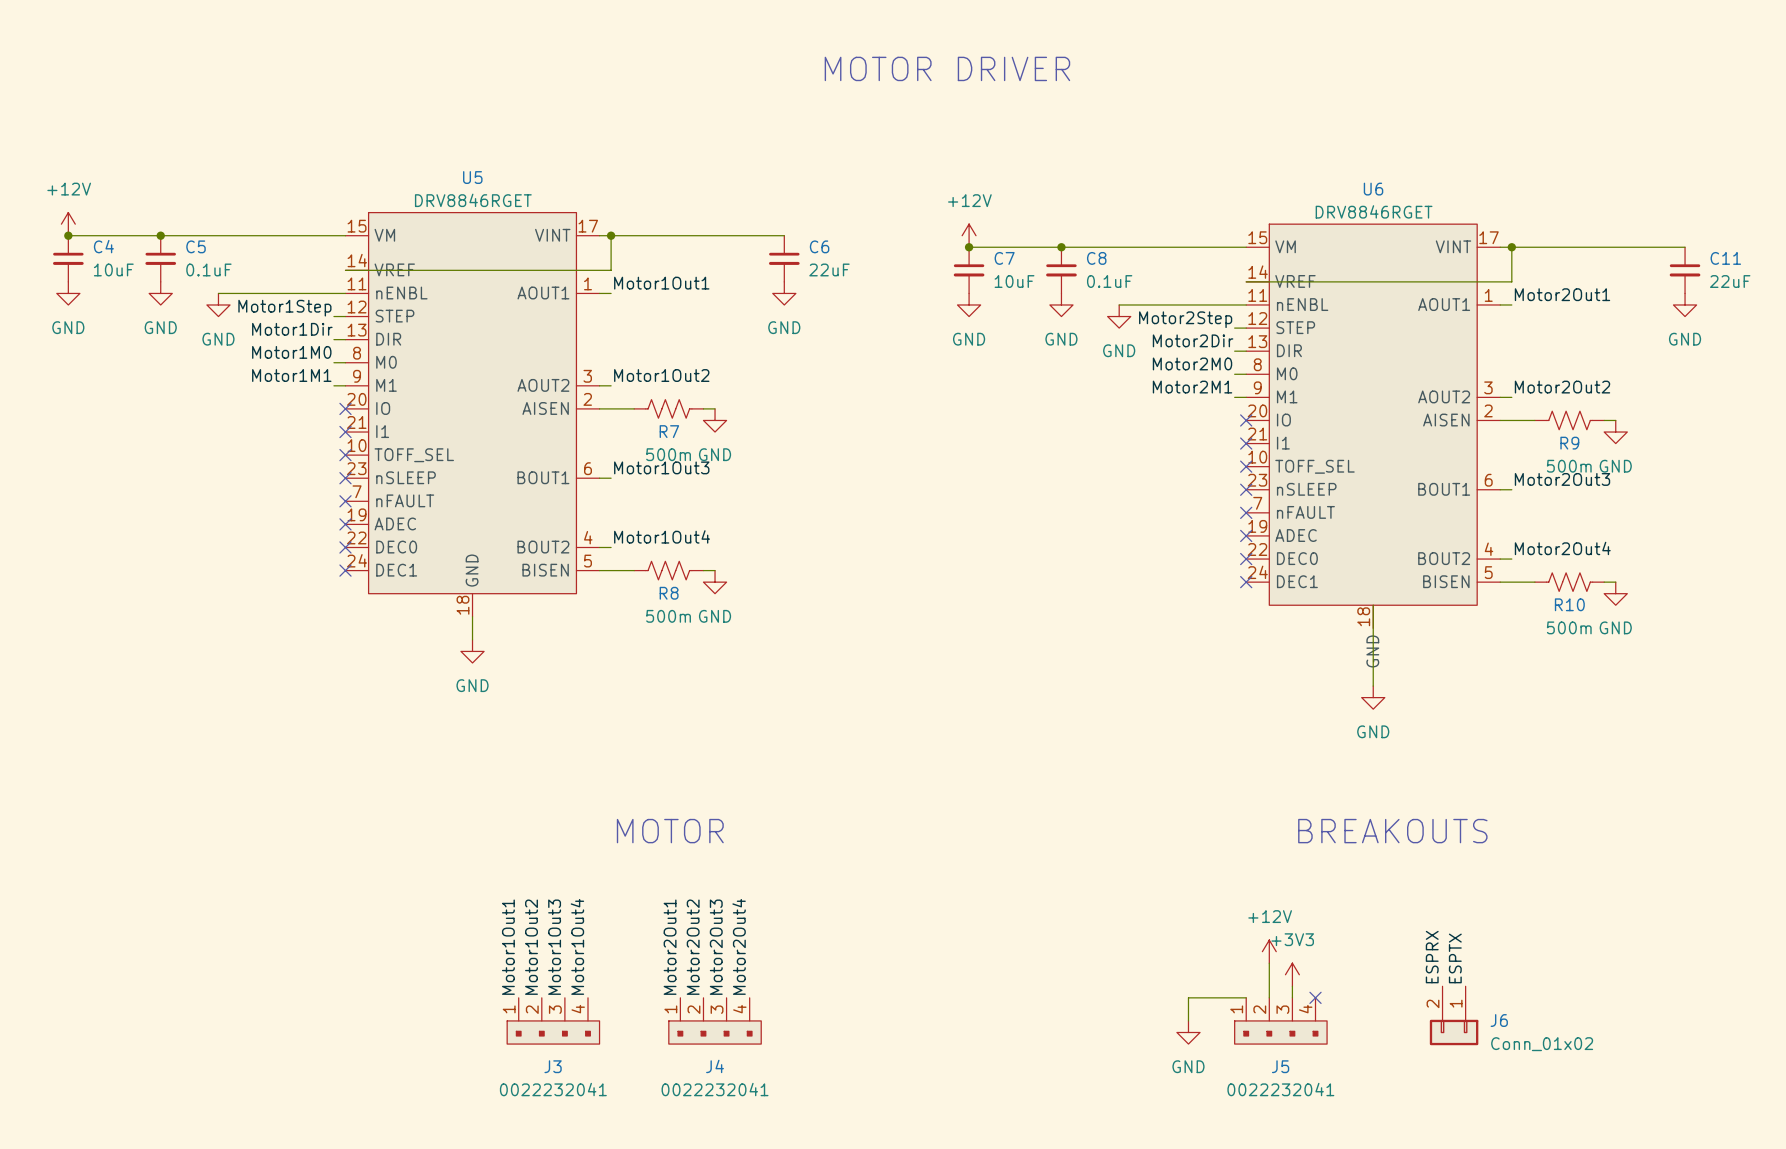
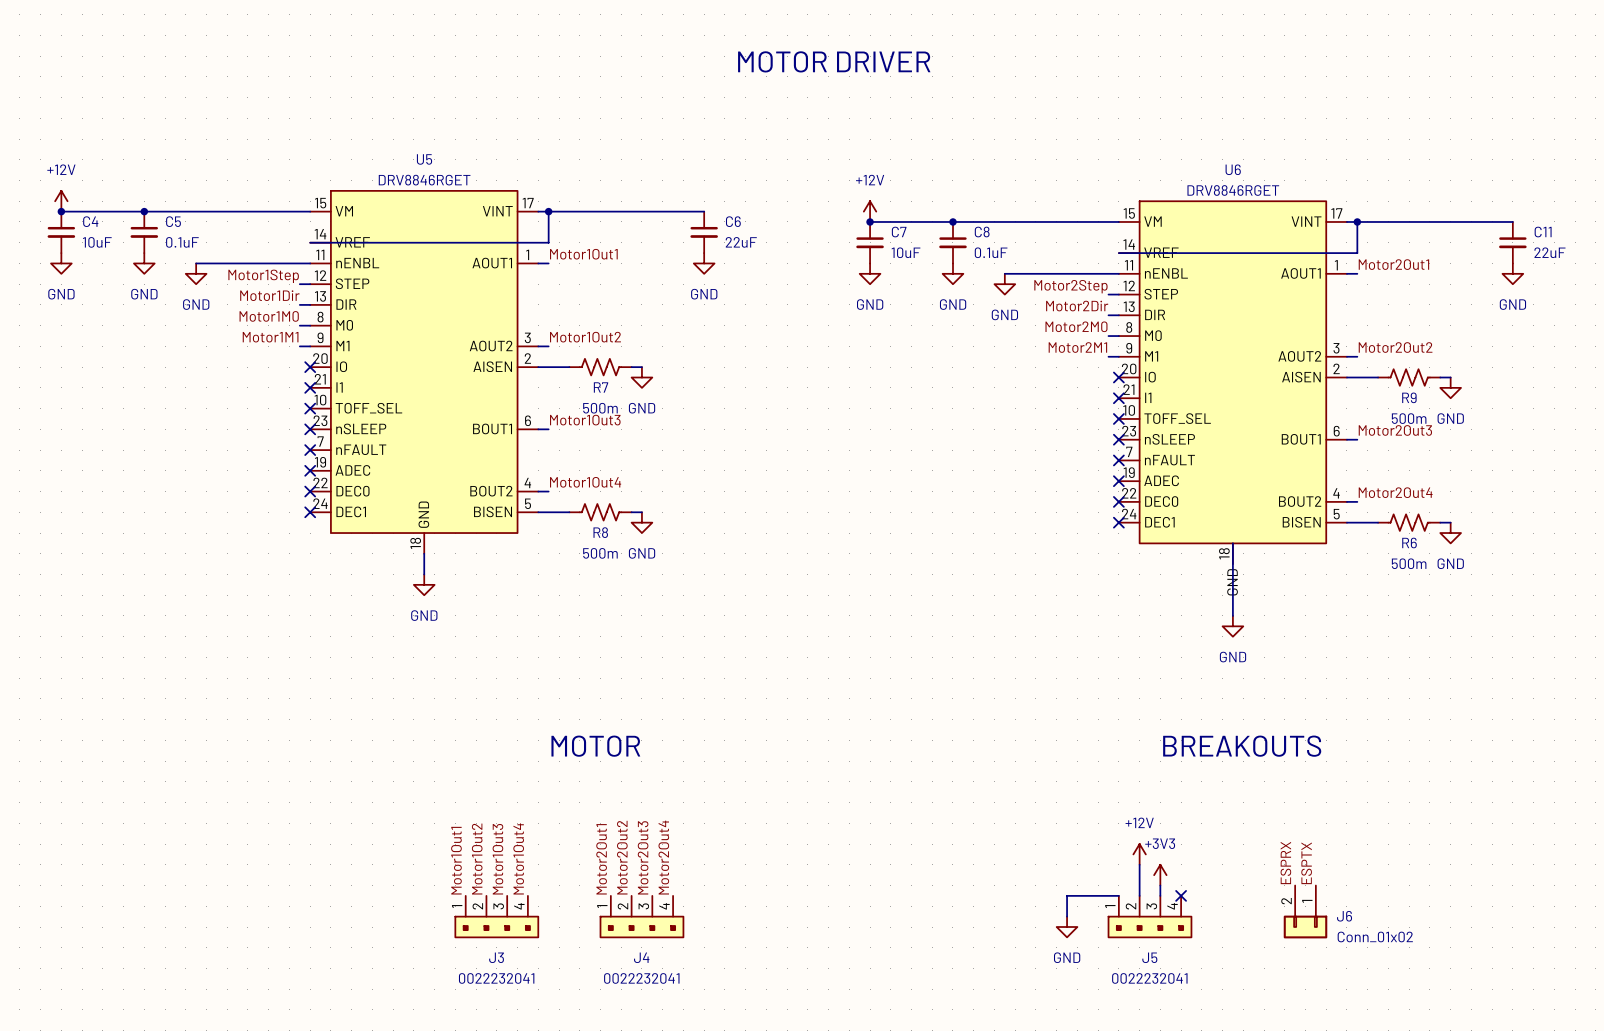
R10 name: R10 (1569, 604) -> R6 (1409, 542)

